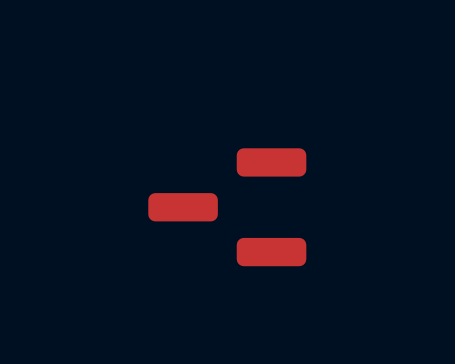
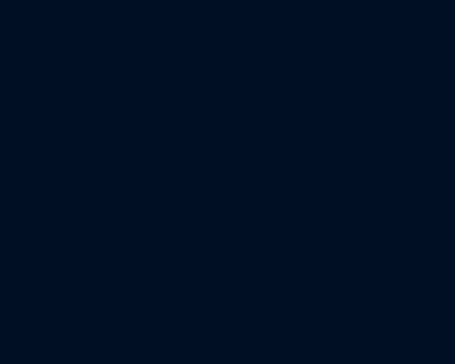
part: (227, 207) -> none

